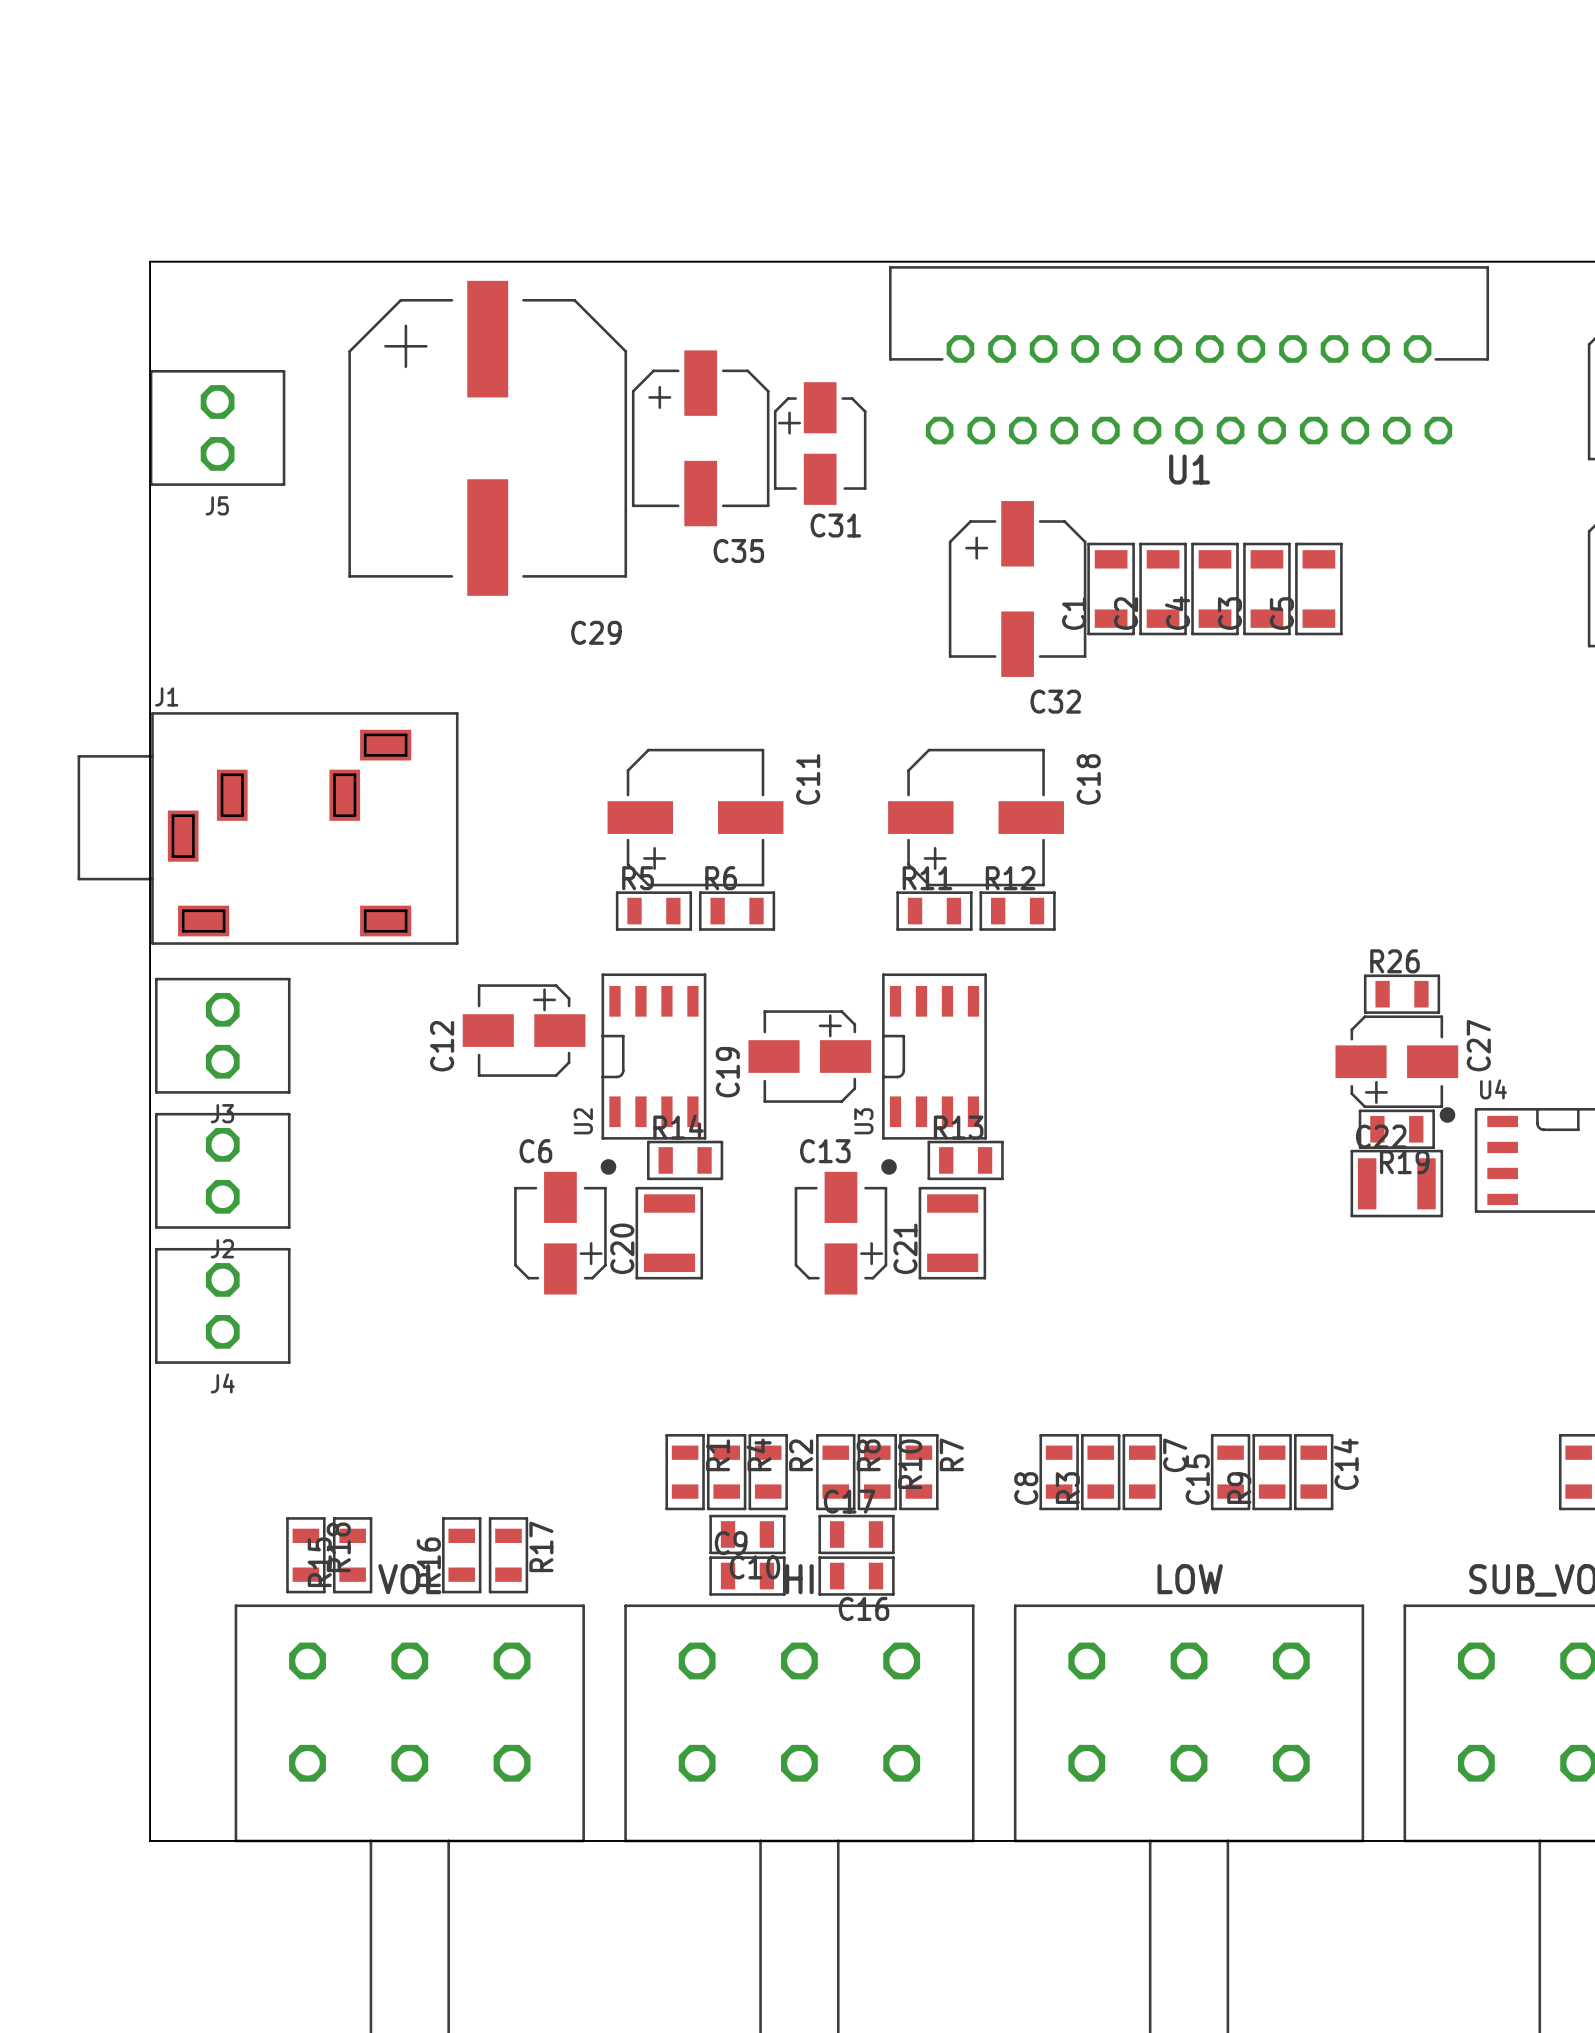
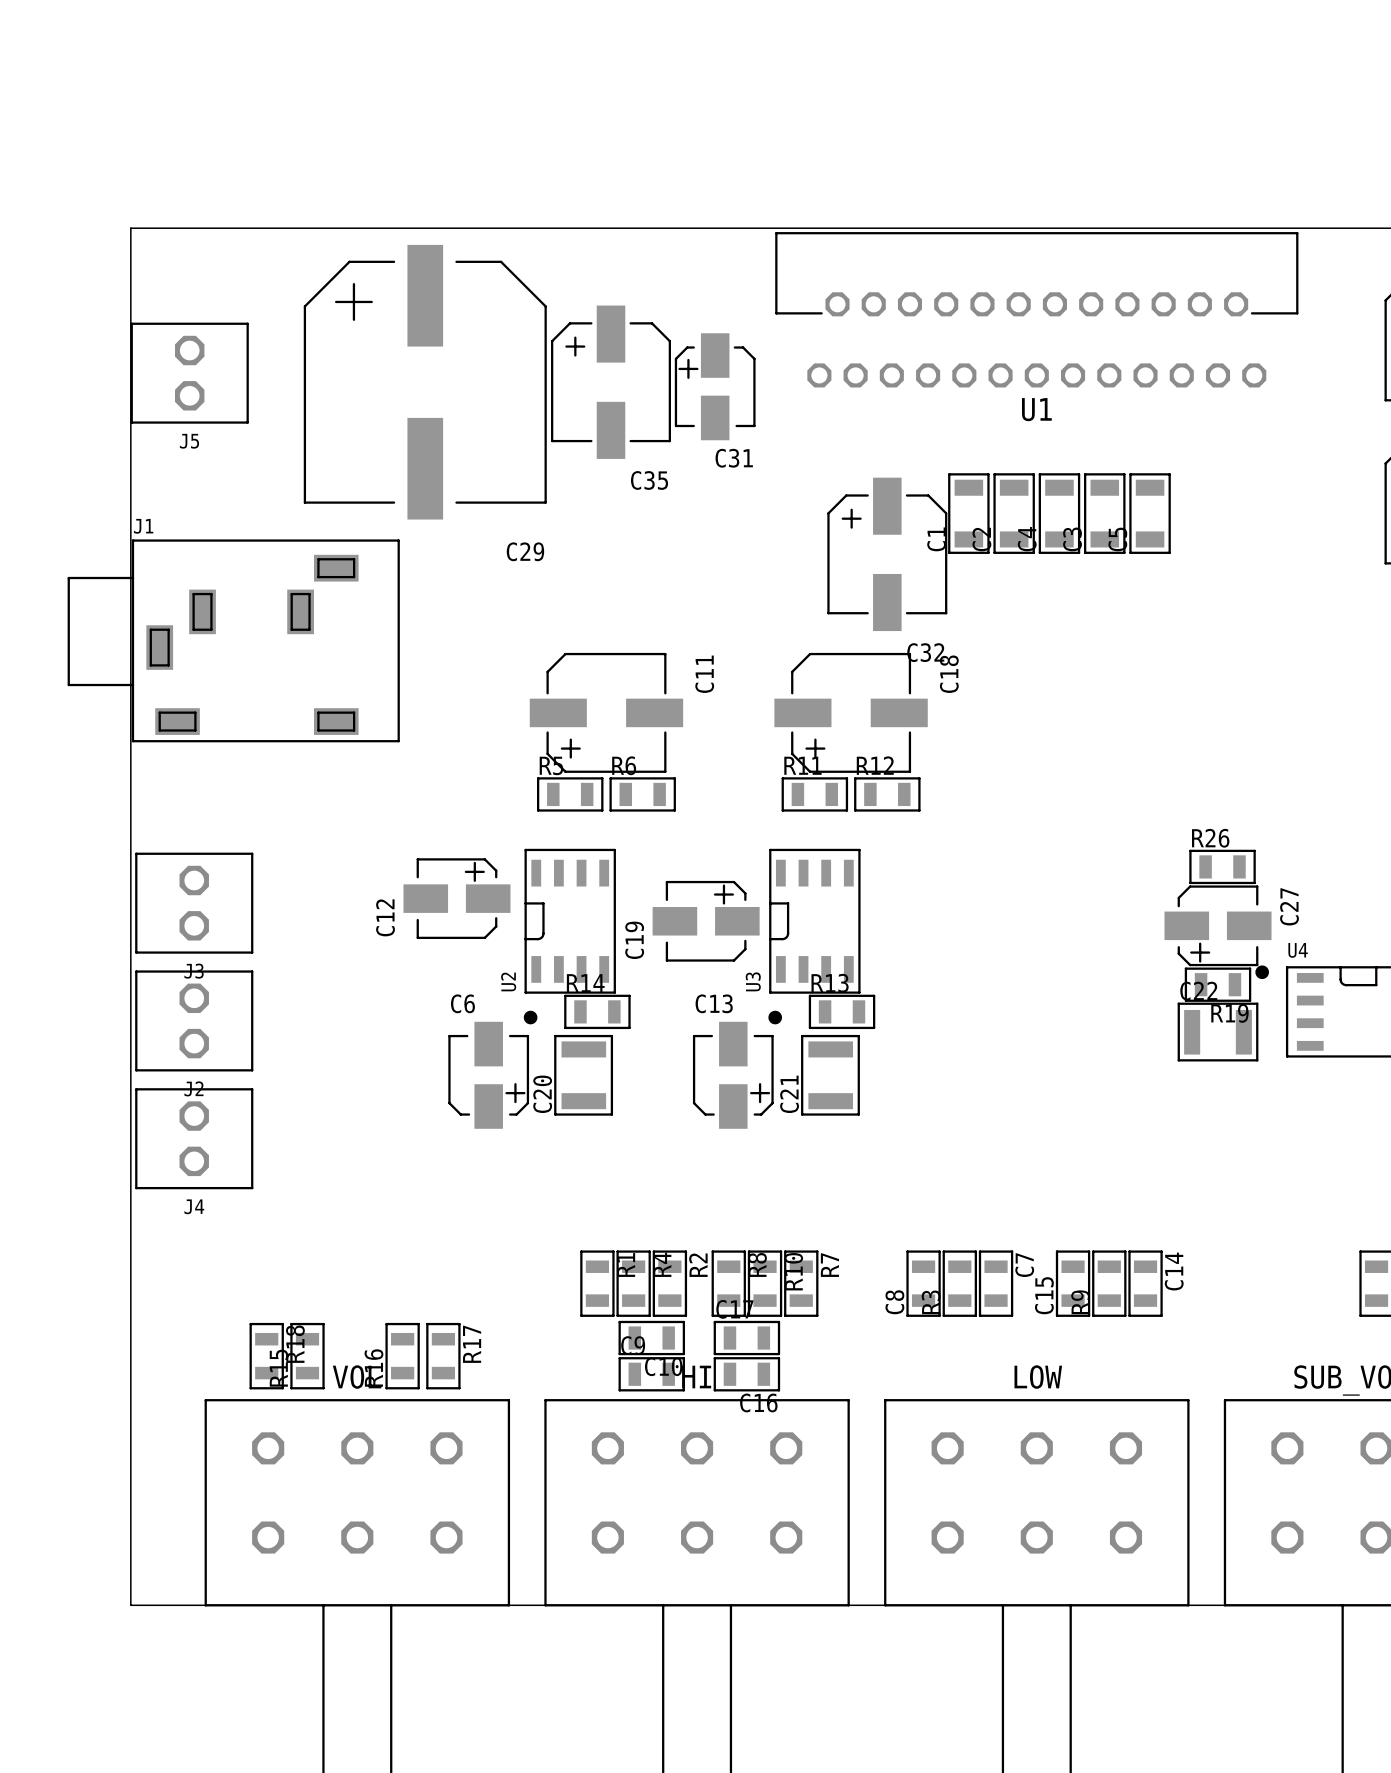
C32 position: (1017, 588) -> (887, 554)
J1 position: (268, 828) -> (233, 640)

